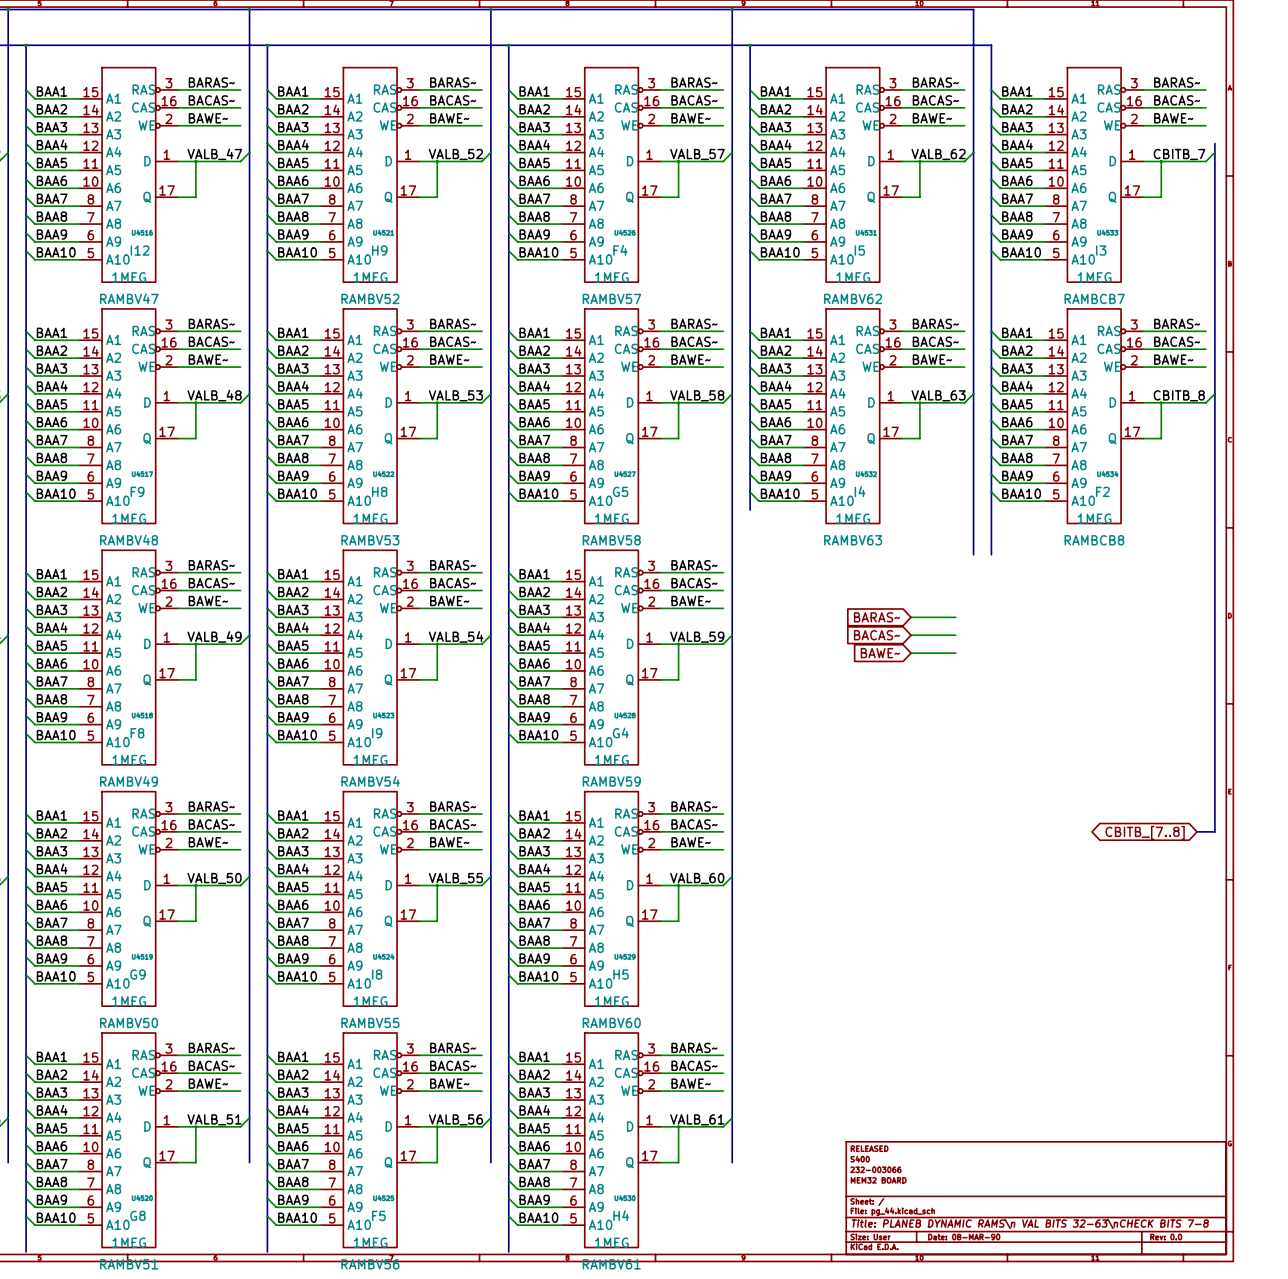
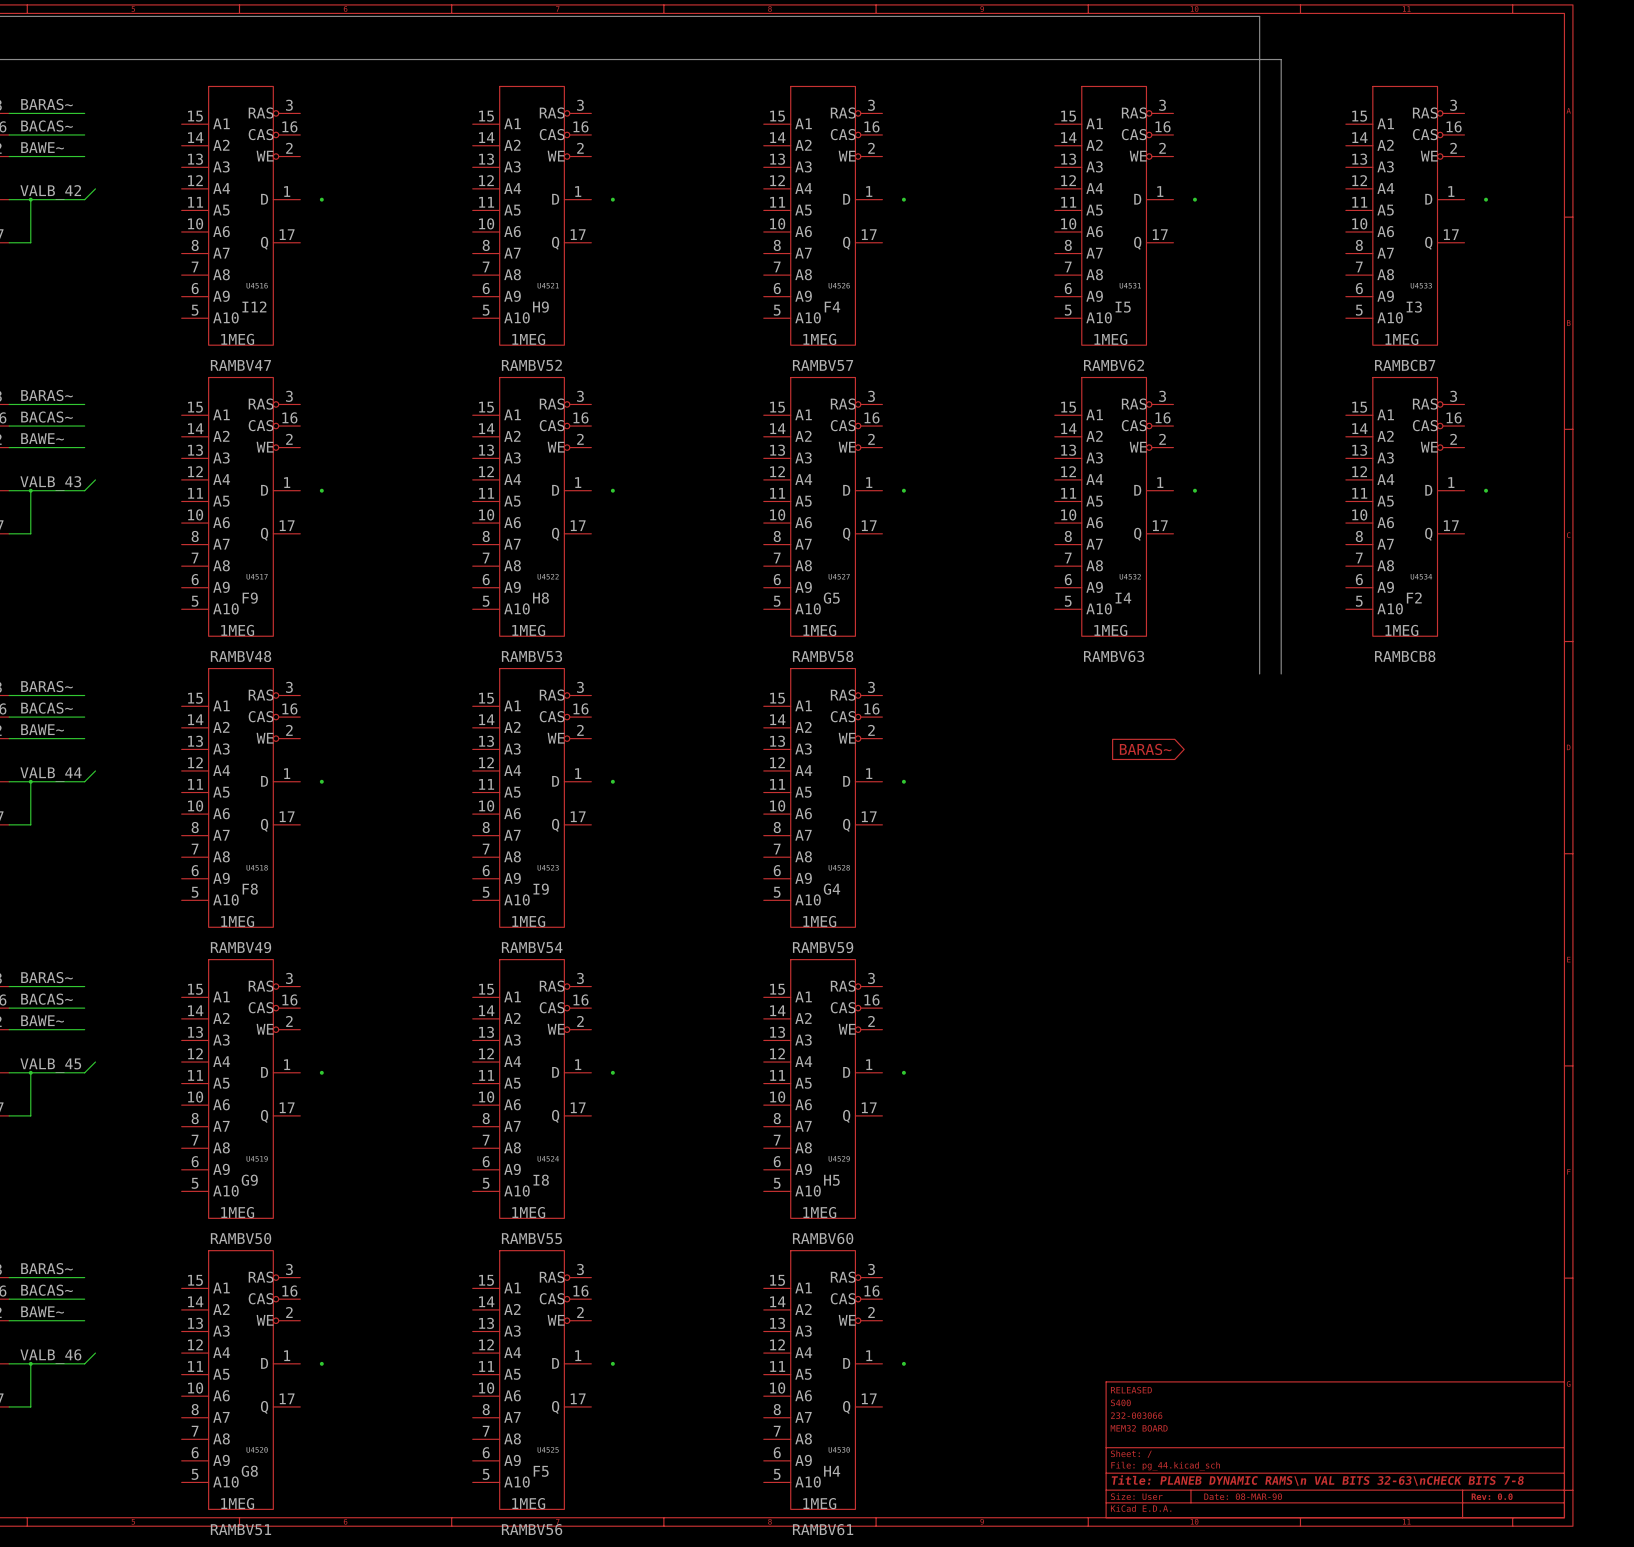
bus: (8, 9) (8, 1162) -> none
junction: (8, 9) -> none
bus: (249, 9) (249, 1162) -> none
junction: (249, 9) -> none
bus: (490, 9) (490, 1162) -> none
junction: (490, 9) -> none
bus: (732, 9) (732, 1162) -> none
junction: (732, 9) -> none
bus: (26, 45) (26, 1251) -> none
junction: (26, 45) -> none
bus: (267, 45) (267, 1251) -> none
junction: (267, 45) -> none
bus: (508, 45) (508, 1251) -> none
junction: (508, 45) -> none
bus: (750, 45) (750, 510) -> none
junction: (750, 45) -> none
label: BARAS~ (211, 82) -> none
label: BARAS~ (453, 82) -> none
label: BARAS~ (694, 82) -> none
label: BARAS~ (935, 82) -> none
label: BARAS~ (1177, 82) -> none
wire: (26, 89) (35, 98) (79, 98) -> none
wire: (178, 89) (240, 89) -> none
wire: (267, 89) (276, 98) (321, 98) -> none
wire: (419, 89) (481, 89) -> none
wire: (508, 89) (517, 98) (562, 98) -> none
wire: (660, 89) (723, 89) -> none
wire: (750, 89) (759, 98) (803, 98) -> none
wire: (902, 89) (964, 89) -> none
wire: (991, 89) (1000, 98) (1045, 98) -> none
wire: (1143, 89) (1205, 89) -> none
label: BAA1 (51, 91) -> none
label: BAA1 (293, 91) -> none
label: BAA1 (534, 91) -> none
label: BAA1 (775, 91) -> none
label: BAA1 (1017, 91) -> none
label: BACAS~ (211, 100) -> none
label: BACAS~ (453, 100) -> none
label: BACAS~ (694, 100) -> none
label: BACAS~ (935, 100) -> none
label: BACAS~ (1177, 100) -> none
wire: (26, 107) (35, 116) (79, 116) -> none
wire: (178, 107) (240, 107) -> none
wire: (267, 107) (276, 116) (321, 116) -> none
wire: (419, 107) (481, 107) -> none
wire: (508, 107) (517, 116) (562, 116) -> none
wire: (660, 107) (723, 107) -> none
wire: (750, 107) (759, 116) (803, 116) -> none
wire: (902, 107) (964, 107) -> none
wire: (991, 107) (1000, 116) (1045, 116) -> none
wire: (1143, 107) (1205, 107) -> none
label: BAA2 (51, 109) -> none
label: BAA2 (293, 109) -> none
label: BAA2 (534, 109) -> none
label: BAA2 (775, 109) -> none
label: BAA2 (1017, 109) -> none
label: BAWE~ (208, 118) -> none
label: BAWE~ (449, 118) -> none
label: BAWE~ (691, 118) -> none
label: BAWE~ (932, 118) -> none
label: BAWE~ (1173, 118) -> none
wire: (26, 125) (35, 134) (79, 134) -> none
wire: (178, 125) (240, 125) -> none
wire: (267, 125) (276, 134) (321, 134) -> none
wire: (419, 125) (481, 125) -> none
wire: (508, 125) (517, 134) (562, 134) -> none
wire: (660, 125) (723, 125) -> none
wire: (750, 125) (759, 134) (803, 134) -> none
wire: (902, 125) (964, 125) -> none
wire: (991, 125) (1000, 134) (1045, 134) -> none
wire: (1143, 125) (1205, 125) -> none
label: BAA3 (51, 127) -> none
label: BAA3 (293, 127) -> none
label: BAA3 (534, 127) -> none
label: BAA3 (775, 127) -> none
label: BAA3 (1017, 127) -> none
wire: (26, 143) (35, 152) (79, 152) -> none
wire: (267, 143) (276, 152) (321, 152) -> none
wire: (508, 143) (517, 152) (562, 152) -> none
wire: (750, 143) (759, 152) (803, 152) -> none
wire: (991, 143) (1000, 152) (1045, 152) -> none
bus: (1214, 143) (1214, 831) (1197, 831) -> none
label: BAA4 (52, 144) -> none
label: BAA4 (293, 144) -> none
label: BAA4 (534, 144) -> none
label: BAA4 (776, 144) -> none
label: BAA4 (1017, 144) -> none
wire: (249, 152) (240, 161) (178, 161) -> none
wire: (490, 152) (481, 161) (419, 161) -> none
wire: (732, 152) (723, 161) (660, 161) -> none
wire: (973, 152) (964, 161) (902, 161) -> none
wire: (1214, 152) (1205, 161) (1143, 161) -> none
label: VALB_47 (214, 154) -> none
label: VALB_52 (455, 154) -> none
label: VALB_57 (697, 154) -> none
label: VALB_62 (938, 154) -> none
label: CBITB_7 (1179, 154) -> none
wire: (26, 161) (35, 170) (79, 170) -> none
wire: (195, 161) (195, 197) (178, 197) -> none
wire: (267, 161) (276, 170) (321, 170) -> none
wire: (437, 161) (437, 197) (419, 197) -> none
wire: (508, 161) (517, 170) (562, 170) -> none
wire: (678, 161) (678, 197) (660, 197) -> none
wire: (750, 161) (759, 170) (803, 170) -> none
wire: (919, 161) (919, 197) (902, 197) -> none
wire: (991, 161) (1000, 170) (1045, 170) -> none
wire: (1161, 161) (1161, 197) (1143, 197) -> none
label: BAA5 (51, 162) -> none
label: BAA5 (293, 162) -> none
label: BAA5 (534, 162) -> none
label: BAA5 (775, 162) -> none
label: BAA5 (1017, 162) -> none
wire: (26, 179) (35, 188) (79, 188) -> none
wire: (267, 179) (276, 188) (321, 188) -> none
wire: (508, 179) (517, 188) (562, 188) -> none
wire: (750, 179) (759, 188) (803, 188) -> none
wire: (991, 179) (1000, 188) (1045, 188) -> none
label: BAA6 (51, 180) -> none
label: BAA6 (293, 180) -> none
label: BAA6 (534, 180) -> none
label: BAA6 (775, 180) -> none
label: BAA6 (1017, 180) -> none
wire: (26, 197) (35, 206) (79, 206) -> none
wire: (267, 197) (276, 206) (321, 206) -> none
wire: (508, 197) (517, 206) (562, 206) -> none
wire: (750, 197) (759, 206) (803, 206) -> none
wire: (991, 197) (1000, 206) (1045, 206) -> none
label: BAA7 (52, 198) -> none
label: BAA7 (293, 198) -> none
label: BAA7 (534, 198) -> none
label: BAA7 (776, 198) -> none
label: BAA7 (1017, 198) -> none
wire: (26, 215) (35, 224) (79, 224) -> none
wire: (267, 215) (276, 224) (321, 224) -> none
wire: (508, 215) (517, 224) (562, 224) -> none
wire: (750, 215) (759, 224) (803, 224) -> none
wire: (991, 215) (1000, 224) (1045, 224) -> none
label: BAA8 (51, 216) -> none
label: BAA8 (293, 216) -> none
label: BAA8 (534, 216) -> none
label: BAA8 (775, 216) -> none
label: BAA8 (1017, 216) -> none
wire: (26, 232) (35, 241) (79, 241) -> none
wire: (267, 232) (276, 241) (321, 241) -> none
wire: (508, 232) (517, 241) (562, 241) -> none
wire: (750, 232) (759, 241) (803, 241) -> none
wire: (991, 232) (1000, 241) (1045, 241) -> none
label: BAA9 (51, 234) -> none
label: BAA9 (293, 234) -> none
label: BAA9 (534, 234) -> none
label: BAA9 (775, 234) -> none
label: BAA9 (1017, 234) -> none
wire: (26, 250) (35, 259) (79, 259) -> none
wire: (267, 250) (276, 259) (321, 259) -> none
wire: (508, 250) (517, 259) (562, 259) -> none
wire: (750, 250) (759, 259) (803, 259) -> none
wire: (991, 250) (1000, 259) (1045, 259) -> none
label: BAA10 (56, 252) -> none
label: BAA10 (297, 252) -> none
label: BAA10 (538, 252) -> none
label: BAA10 (780, 252) -> none
label: BAA10 (1021, 252) -> none
label: BARAS~ (211, 323) -> none
label: BARAS~ (453, 323) -> none
label: BARAS~ (694, 323) -> none
label: BARAS~ (935, 323) -> none
label: BARAS~ (1177, 323) -> none
wire: (26, 331) (35, 340) (79, 340) -> none
wire: (178, 331) (240, 331) -> none
wire: (267, 331) (276, 340) (321, 340) -> none
wire: (419, 331) (481, 331) -> none
wire: (508, 331) (517, 340) (562, 340) -> none
wire: (660, 331) (723, 331) -> none
wire: (750, 331) (759, 340) (803, 340) -> none
wire: (902, 331) (964, 331) -> none
wire: (991, 331) (1000, 340) (1045, 340) -> none
wire: (1143, 331) (1205, 331) -> none
label: BAA1 (51, 332) -> none
label: BAA1 (293, 332) -> none
label: BAA1 (534, 332) -> none
label: BAA1 (775, 332) -> none
label: BAA1 (1017, 332) -> none
label: BACAS~ (211, 341) -> none
label: BACAS~ (453, 341) -> none
label: BACAS~ (694, 341) -> none
label: BACAS~ (935, 341) -> none
label: BACAS~ (1177, 341) -> none
wire: (26, 349) (35, 358) (79, 358) -> none
wire: (178, 349) (240, 349) -> none
wire: (267, 349) (276, 358) (321, 358) -> none
wire: (419, 349) (481, 349) -> none
wire: (508, 349) (517, 358) (562, 358) -> none
wire: (660, 349) (723, 349) -> none
wire: (750, 349) (759, 358) (803, 358) -> none
wire: (902, 349) (964, 349) -> none
wire: (991, 349) (1000, 358) (1045, 358) -> none
wire: (1143, 349) (1205, 349) -> none
label: BAA2 (51, 350) -> none
label: BAA2 (293, 350) -> none
label: BAA2 (534, 350) -> none
label: BAA2 (775, 350) -> none
label: BAA2 (1017, 350) -> none
label: BAWE~ (208, 359) -> none
label: BAWE~ (449, 359) -> none
label: BAWE~ (691, 359) -> none
label: BAWE~ (932, 359) -> none
label: BAWE~ (1173, 359) -> none
wire: (26, 367) (35, 376) (79, 376) -> none
wire: (178, 367) (240, 367) -> none
wire: (267, 367) (276, 376) (321, 376) -> none
wire: (419, 367) (481, 367) -> none
wire: (508, 367) (517, 376) (562, 376) -> none
wire: (660, 367) (723, 367) -> none
wire: (750, 367) (759, 376) (803, 376) -> none
wire: (902, 367) (964, 367) -> none
wire: (991, 367) (1000, 376) (1045, 376) -> none
wire: (1143, 367) (1205, 367) -> none
label: BAA3 (51, 368) -> none
label: BAA3 (293, 368) -> none
label: BAA3 (534, 368) -> none
label: BAA3 (775, 368) -> none
label: BAA3 (1017, 368) -> none
wire: (26, 384) (35, 393) (79, 393) -> none
wire: (267, 384) (276, 393) (321, 393) -> none
wire: (508, 384) (517, 393) (562, 393) -> none
wire: (750, 384) (759, 393) (803, 393) -> none
wire: (991, 384) (1000, 393) (1045, 393) -> none
label: BAA4 (52, 386) -> none
label: BAA4 (293, 386) -> none
label: BAA4 (534, 386) -> none
label: BAA4 (776, 386) -> none
label: BAA4 (1017, 386) -> none
wire: (249, 393) (240, 402) (178, 402) -> none
wire: (490, 393) (481, 402) (419, 402) -> none
wire: (732, 393) (723, 402) (660, 402) -> none
wire: (973, 393) (964, 402) (902, 402) -> none
wire: (1214, 393) (1205, 402) (1143, 402) -> none
label: VALB_48 (214, 395) -> none
label: VALB_53 (455, 395) -> none
label: VALB_58 (697, 395) -> none
label: VALB_63 (938, 395) -> none
label: CBITB_8 (1179, 395) -> none
wire: (26, 402) (35, 411) (79, 411) -> none
wire: (195, 402) (195, 438) (178, 438) -> none
wire: (267, 402) (276, 411) (321, 411) -> none
wire: (437, 402) (437, 438) (419, 438) -> none
wire: (508, 402) (517, 411) (562, 411) -> none
wire: (678, 402) (678, 438) (660, 438) -> none
wire: (750, 402) (759, 411) (803, 411) -> none
wire: (919, 402) (919, 438) (902, 438) -> none
wire: (991, 402) (1000, 411) (1045, 411) -> none
wire: (1161, 402) (1161, 438) (1143, 438) -> none
label: BAA5 (51, 404) -> none
label: BAA5 (293, 404) -> none
label: BAA5 (534, 404) -> none
label: BAA5 (775, 404) -> none
label: BAA5 (1017, 404) -> none
wire: (26, 420) (35, 429) (79, 429) -> none
wire: (267, 420) (276, 429) (321, 429) -> none
wire: (508, 420) (517, 429) (562, 429) -> none
wire: (750, 420) (759, 429) (803, 429) -> none
wire: (991, 420) (1000, 429) (1045, 429) -> none
label: BAA6 (51, 422) -> none
label: BAA6 (293, 422) -> none
label: BAA6 (534, 422) -> none
label: BAA6 (775, 422) -> none
label: BAA6 (1017, 422) -> none
wire: (26, 438) (35, 447) (79, 447) -> none
wire: (267, 438) (276, 447) (321, 447) -> none
wire: (508, 438) (517, 447) (562, 447) -> none
wire: (750, 438) (759, 447) (803, 447) -> none
wire: (991, 438) (1000, 447) (1045, 447) -> none
label: BAA7 (52, 440) -> none
label: BAA7 (293, 440) -> none
label: BAA7 (534, 440) -> none
label: BAA7 (776, 440) -> none
label: BAA7 (1017, 440) -> none
wire: (26, 456) (35, 465) (79, 465) -> none
wire: (267, 456) (276, 465) (321, 465) -> none
wire: (508, 456) (517, 465) (562, 465) -> none
wire: (750, 456) (759, 465) (803, 465) -> none
wire: (991, 456) (1000, 465) (1045, 465) -> none
label: BAA8 (51, 457) -> none
label: BAA8 (293, 457) -> none
label: BAA8 (534, 457) -> none
label: BAA8 (775, 457) -> none
label: BAA8 (1017, 457) -> none
wire: (26, 474) (35, 483) (79, 483) -> none
wire: (267, 474) (276, 483) (321, 483) -> none
wire: (508, 474) (517, 483) (562, 483) -> none
wire: (750, 474) (759, 483) (803, 483) -> none
wire: (991, 474) (1000, 483) (1045, 483) -> none
label: BAA9 (51, 475) -> none
label: BAA9 (293, 475) -> none
label: BAA9 (534, 475) -> none
label: BAA9 (775, 475) -> none
label: BAA9 (1017, 475) -> none
wire: (26, 492) (35, 501) (79, 501) -> none
wire: (267, 492) (276, 501) (321, 501) -> none
wire: (508, 492) (517, 501) (562, 501) -> none
wire: (750, 492) (759, 501) (803, 501) -> none
wire: (991, 492) (1000, 501) (1045, 501) -> none
label: BAA10 (56, 493) -> none
label: BAA10 (297, 493) -> none
label: BAA10 (538, 493) -> none
label: BAA10 (780, 493) -> none
label: BAA10 (1021, 493) -> none
label: BARAS~ (211, 565) -> none
label: BARAS~ (453, 565) -> none
label: BARAS~ (694, 565) -> none
wire: (26, 572) (35, 581) (79, 581) -> none
wire: (178, 572) (240, 572) -> none
wire: (267, 572) (276, 581) (321, 581) -> none
wire: (419, 572) (481, 572) -> none
wire: (508, 572) (517, 581) (562, 581) -> none
wire: (660, 572) (723, 572) -> none
label: BAA1 (51, 574) -> none
label: BAA1 (293, 574) -> none
label: BAA1 (534, 574) -> none
label: BACAS~ (211, 583) -> none
label: BACAS~ (453, 583) -> none
label: BACAS~ (694, 583) -> none
wire: (26, 590) (35, 599) (79, 599) -> none
wire: (178, 590) (240, 590) -> none
wire: (267, 590) (276, 599) (321, 599) -> none
wire: (419, 590) (481, 590) -> none
wire: (508, 590) (517, 599) (562, 599) -> none
wire: (660, 590) (723, 590) -> none
label: BAA2 (51, 592) -> none
label: BAA2 (293, 592) -> none
label: BAA2 (534, 592) -> none
label: BAWE~ (208, 600) -> none
label: BAWE~ (449, 600) -> none
label: BAWE~ (691, 600) -> none
wire: (26, 608) (35, 617) (79, 617) -> none
wire: (178, 608) (240, 608) -> none
wire: (267, 608) (276, 617) (321, 617) -> none
wire: (419, 608) (481, 608) -> none
wire: (508, 608) (517, 617) (562, 617) -> none
wire: (660, 608) (723, 608) -> none
label: BAA3 (51, 609) -> none
label: BAA3 (293, 609) -> none
label: BAA3 (534, 609) -> none
wire: (910, 617) (955, 617) -> none
wire: (26, 626) (35, 635) (79, 635) -> none
wire: (267, 626) (276, 635) (321, 635) -> none
wire: (508, 626) (517, 635) (562, 635) -> none
label: BAA4 (52, 627) -> none
label: BAA4 (293, 627) -> none
label: BAA4 (534, 627) -> none
wire: (249, 635) (240, 644) (178, 644) -> none
wire: (490, 635) (481, 644) (419, 644) -> none
wire: (732, 635) (723, 644) (660, 644) -> none
global label: BACAS~ (876, 635) -> none
wire: (910, 635) (955, 635) -> none
label: VALB_49 (214, 636) -> none
label: VALB_54 (456, 636) -> none
label: VALB_59 (697, 637) -> none
wire: (26, 644) (35, 653) (79, 653) -> none
wire: (195, 644) (195, 679) (178, 679) -> none
wire: (267, 644) (276, 653) (321, 653) -> none
wire: (437, 644) (437, 679) (419, 679) -> none
wire: (508, 644) (517, 653) (562, 653) -> none
wire: (678, 644) (678, 679) (660, 679) -> none
label: BAA5 (51, 645) -> none
label: BAA5 (293, 645) -> none
label: BAA5 (534, 645) -> none
global label: BAWE~ (880, 653) -> none
wire: (910, 653) (955, 653) -> none
wire: (26, 662) (35, 670) (79, 670) -> none
wire: (267, 662) (276, 670) (321, 670) -> none
wire: (508, 662) (517, 670) (562, 670) -> none
label: BAA6 (51, 663) -> none
label: BAA6 (293, 663) -> none
label: BAA6 (534, 663) -> none
wire: (26, 679) (35, 688) (79, 688) -> none
wire: (267, 679) (276, 688) (321, 688) -> none
wire: (508, 679) (517, 688) (562, 688) -> none
label: BAA7 (52, 681) -> none
label: BAA7 (293, 681) -> none
label: BAA7 (534, 681) -> none
wire: (26, 697) (35, 706) (79, 706) -> none
wire: (267, 697) (276, 706) (321, 706) -> none
wire: (508, 697) (517, 706) (562, 706) -> none
label: BAA8 (51, 699) -> none
label: BAA8 (293, 699) -> none
label: BAA8 (534, 699) -> none
wire: (26, 715) (35, 724) (79, 724) -> none
wire: (267, 715) (276, 724) (321, 724) -> none
wire: (508, 715) (517, 724) (562, 724) -> none
label: BAA9 (51, 717) -> none
label: BAA9 (293, 717) -> none
label: BAA9 (534, 717) -> none
wire: (26, 733) (35, 742) (79, 742) -> none
wire: (267, 733) (276, 742) (321, 742) -> none
wire: (508, 733) (517, 742) (562, 742) -> none
label: BAA10 (56, 735) -> none
label: BAA10 (297, 735) -> none
label: BAA10 (538, 735) -> none
label: BARAS~ (211, 806) -> none
label: BARAS~ (453, 806) -> none
label: BARAS~ (694, 806) -> none
wire: (26, 814) (35, 822) (79, 822) -> none
wire: (178, 814) (240, 814) -> none
wire: (267, 814) (276, 822) (321, 822) -> none
wire: (419, 814) (481, 814) -> none
wire: (508, 814) (517, 822) (562, 822) -> none
wire: (660, 814) (723, 814) -> none
label: BAA1 (51, 815) -> none
label: BAA1 (293, 815) -> none
label: BAA1 (534, 815) -> none
label: BACAS~ (211, 824) -> none
label: BACAS~ (453, 824) -> none
label: BACAS~ (694, 824) -> none
wire: (26, 831) (35, 840) (79, 840) -> none
wire: (178, 831) (240, 831) -> none
wire: (267, 831) (276, 840) (321, 840) -> none
wire: (419, 831) (481, 831) -> none
wire: (508, 831) (517, 840) (562, 840) -> none
wire: (660, 831) (723, 831) -> none
global label: CBITB_[7..8] (1145, 832) -> none
label: BAA2 (51, 833) -> none
label: BAA2 (293, 833) -> none
label: BAA2 (534, 833) -> none
label: BAWE~ (208, 842) -> none
label: BAWE~ (449, 842) -> none
label: BAWE~ (691, 842) -> none
wire: (26, 849) (35, 858) (79, 858) -> none
wire: (178, 849) (240, 849) -> none
wire: (267, 849) (276, 858) (321, 858) -> none
wire: (419, 849) (481, 849) -> none
wire: (508, 849) (517, 858) (562, 858) -> none
wire: (660, 849) (723, 849) -> none
label: BAA3 (51, 851) -> none
label: BAA3 (293, 851) -> none
label: BAA3 (534, 851) -> none
wire: (26, 867) (35, 876) (79, 876) -> none
wire: (267, 867) (276, 876) (321, 876) -> none
wire: (508, 867) (517, 876) (562, 876) -> none
label: BAA4 (52, 868) -> none
label: BAA4 (293, 868) -> none
label: BAA4 (534, 868) -> none
wire: (249, 876) (240, 885) (178, 885) -> none
wire: (490, 876) (481, 885) (419, 885) -> none
wire: (732, 876) (723, 885) (660, 885) -> none
label: VALB_50 (214, 878) -> none
label: VALB_55 (455, 878) -> none
label: VALB_60 (697, 878) -> none
wire: (26, 885) (35, 894) (79, 894) -> none
wire: (195, 885) (195, 921) (178, 921) -> none
wire: (267, 885) (276, 894) (321, 894) -> none
wire: (437, 885) (437, 921) (419, 921) -> none
wire: (508, 885) (517, 894) (562, 894) -> none
wire: (678, 885) (678, 921) (660, 921) -> none
label: BAA5 (51, 887) -> none
label: BAA5 (293, 887) -> none
label: BAA5 (534, 887) -> none
wire: (26, 903) (35, 912) (79, 912) -> none
wire: (267, 903) (276, 912) (321, 912) -> none
wire: (508, 903) (517, 912) (562, 912) -> none
label: BAA6 (51, 904) -> none
label: BAA6 (293, 904) -> none
label: BAA6 (534, 904) -> none
wire: (26, 921) (35, 930) (79, 930) -> none
wire: (267, 921) (276, 930) (321, 930) -> none
wire: (508, 921) (517, 930) (562, 930) -> none
label: BAA7 (52, 922) -> none
label: BAA7 (293, 922) -> none
label: BAA7 (534, 922) -> none
wire: (26, 939) (35, 948) (79, 948) -> none
wire: (267, 939) (276, 948) (321, 948) -> none
wire: (508, 939) (517, 948) (562, 948) -> none
label: BAA8 (51, 940) -> none
label: BAA8 (293, 940) -> none
label: BAA8 (534, 940) -> none
wire: (26, 957) (35, 965) (79, 965) -> none
wire: (267, 957) (276, 965) (321, 965) -> none
wire: (508, 957) (517, 965) (562, 965) -> none
label: BAA9 (51, 958) -> none
label: BAA9 (293, 958) -> none
label: BAA9 (534, 958) -> none
wire: (26, 974) (35, 983) (79, 983) -> none
wire: (267, 974) (276, 983) (321, 983) -> none
wire: (508, 974) (517, 983) (562, 983) -> none
label: BAA10 (56, 976) -> none
label: BAA10 (297, 976) -> none
label: BAA10 (538, 976) -> none
label: BARAS~ (211, 1047) -> none
label: BARAS~ (453, 1047) -> none
label: BARAS~ (694, 1047) -> none
wire: (26, 1055) (35, 1064) (79, 1064) -> none
wire: (178, 1055) (240, 1055) -> none
wire: (267, 1055) (276, 1064) (321, 1064) -> none
wire: (419, 1055) (481, 1055) -> none
wire: (508, 1055) (517, 1064) (562, 1064) -> none
wire: (660, 1055) (723, 1055) -> none
label: BAA1 (51, 1056) -> none
label: BAA1 (293, 1056) -> none
label: BAA1 (534, 1056) -> none
label: BACAS~ (211, 1065) -> none
label: BACAS~ (453, 1065) -> none
label: BACAS~ (694, 1065) -> none
wire: (26, 1073) (35, 1082) (79, 1082) -> none
wire: (178, 1073) (240, 1073) -> none
wire: (267, 1073) (276, 1082) (321, 1082) -> none
wire: (419, 1073) (481, 1073) -> none
wire: (508, 1073) (517, 1082) (562, 1082) -> none
wire: (660, 1073) (723, 1073) -> none
label: BAA2 (51, 1074) -> none
label: BAA2 (293, 1074) -> none
label: BAA2 (534, 1074) -> none
label: BAWE~ (208, 1083) -> none
label: BAWE~ (449, 1083) -> none
label: BAWE~ (691, 1083) -> none
wire: (26, 1091) (35, 1100) (79, 1100) -> none
wire: (178, 1091) (240, 1091) -> none
wire: (267, 1091) (276, 1100) (321, 1100) -> none
wire: (419, 1091) (481, 1091) -> none
wire: (508, 1091) (517, 1100) (562, 1100) -> none
wire: (660, 1091) (723, 1091) -> none
label: BAA3 (51, 1092) -> none
label: BAA3 (293, 1092) -> none
label: BAA3 (534, 1092) -> none
wire: (26, 1108) (35, 1117) (79, 1117) -> none
wire: (267, 1108) (276, 1117) (321, 1117) -> none
wire: (508, 1108) (517, 1117) (562, 1117) -> none
label: BAA4 (52, 1110) -> none
label: BAA4 (293, 1110) -> none
label: BAA4 (534, 1110) -> none
wire: (249, 1117) (240, 1126) (178, 1126) -> none
wire: (490, 1117) (481, 1126) (419, 1126) -> none
wire: (732, 1117) (723, 1126) (660, 1126) -> none
label: VALB_51 (214, 1119) -> none
label: VALB_56 (455, 1119) -> none
label: VALB_61 (697, 1119) -> none
wire: (26, 1126) (35, 1135) (79, 1135) -> none
wire: (195, 1126) (195, 1162) (178, 1162) -> none
wire: (267, 1126) (276, 1135) (321, 1135) -> none
wire: (437, 1126) (437, 1162) (419, 1162) -> none
wire: (508, 1126) (517, 1135) (562, 1135) -> none
wire: (678, 1126) (678, 1162) (660, 1162) -> none
label: BAA5 (51, 1128) -> none
label: BAA5 (293, 1128) -> none
label: BAA5 (534, 1128) -> none
wire: (26, 1144) (35, 1153) (79, 1153) -> none
wire: (267, 1144) (276, 1153) (321, 1153) -> none
wire: (508, 1144) (517, 1153) (562, 1153) -> none
label: BAA6 (51, 1146) -> none
label: BAA6 (293, 1146) -> none
label: BAA6 (534, 1146) -> none
wire: (26, 1162) (35, 1171) (79, 1171) -> none
wire: (267, 1162) (276, 1171) (321, 1171) -> none
wire: (508, 1162) (517, 1171) (562, 1171) -> none
label: BAA7 (52, 1164) -> none
label: BAA7 (293, 1164) -> none
label: BAA7 (534, 1164) -> none
wire: (26, 1180) (35, 1189) (79, 1189) -> none
wire: (267, 1180) (276, 1189) (321, 1189) -> none
wire: (508, 1180) (517, 1189) (562, 1189) -> none
label: BAA8 (51, 1181) -> none
label: BAA8 (293, 1181) -> none
label: BAA8 (534, 1181) -> none
wire: (26, 1198) (35, 1207) (79, 1207) -> none
wire: (267, 1198) (276, 1207) (321, 1207) -> none
wire: (508, 1198) (517, 1207) (562, 1207) -> none
label: BAA9 (51, 1199) -> none
label: BAA9 (293, 1199) -> none
label: BAA9 (534, 1199) -> none
wire: (26, 1216) (35, 1225) (79, 1225) -> none
wire: (267, 1216) (276, 1225) (321, 1225) -> none
wire: (508, 1216) (517, 1225) (562, 1225) -> none
label: BAA10 (56, 1217) -> none
label: BAA10 (297, 1217) -> none
label: BAA10 (538, 1217) -> none

